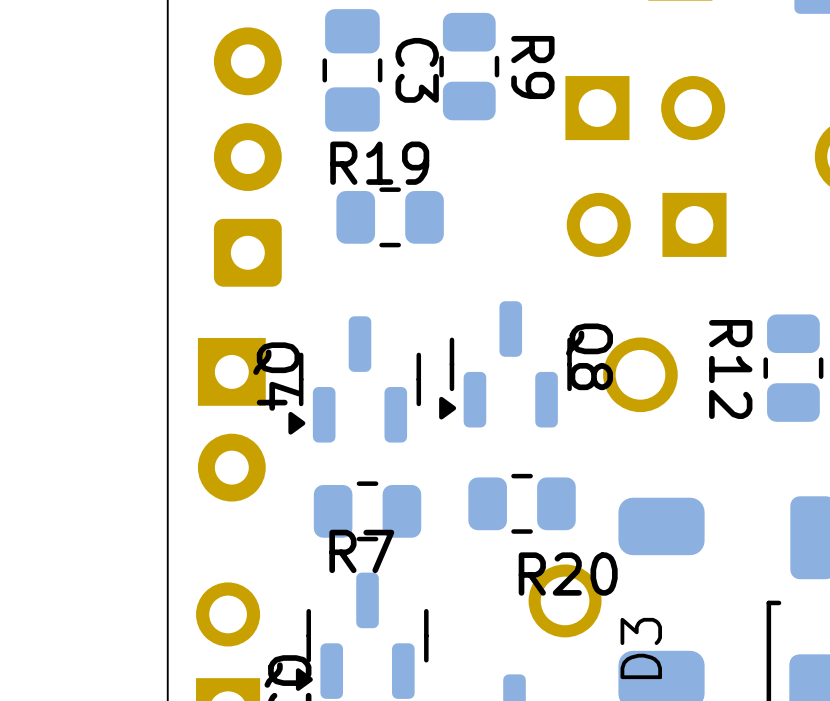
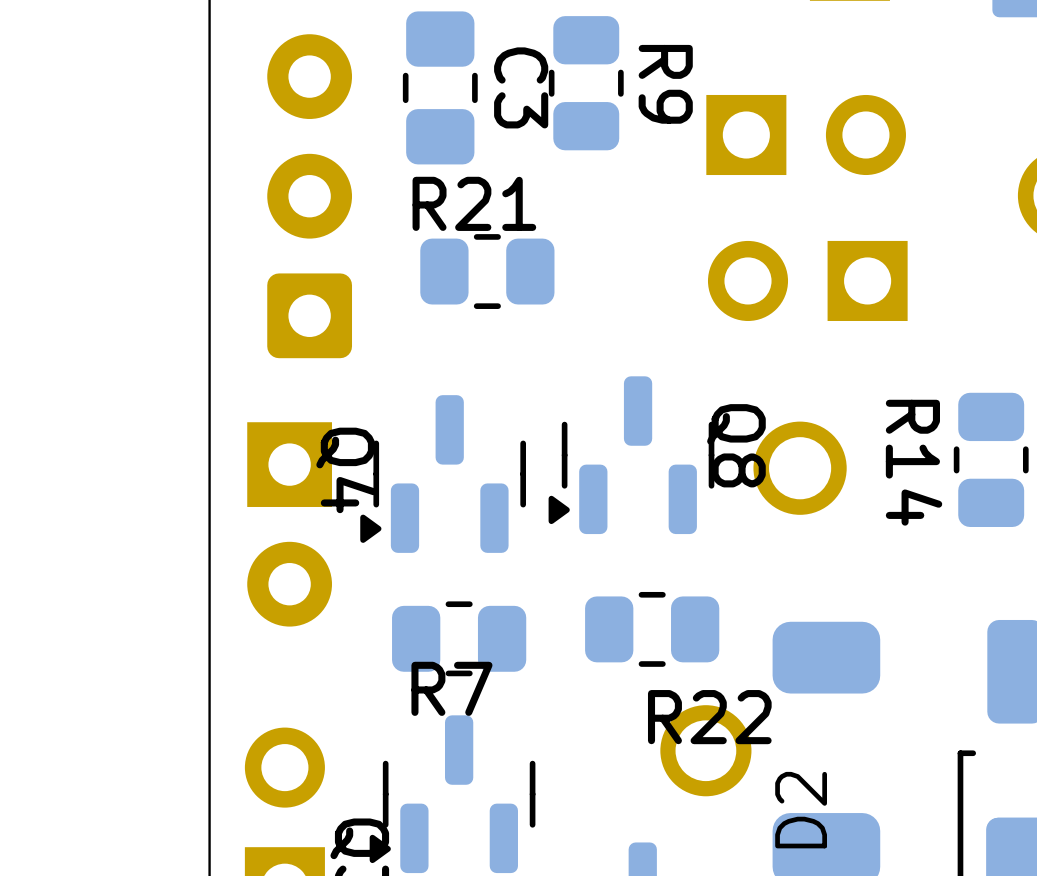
R19 name: R19 (379, 163) -> R21 (474, 203)
R12 name: R12 (730, 369) -> R14 (914, 462)
R20 name: R20 (568, 574) -> R22 (709, 717)
D3 name: D3 (641, 648) -> D2 (801, 810)

